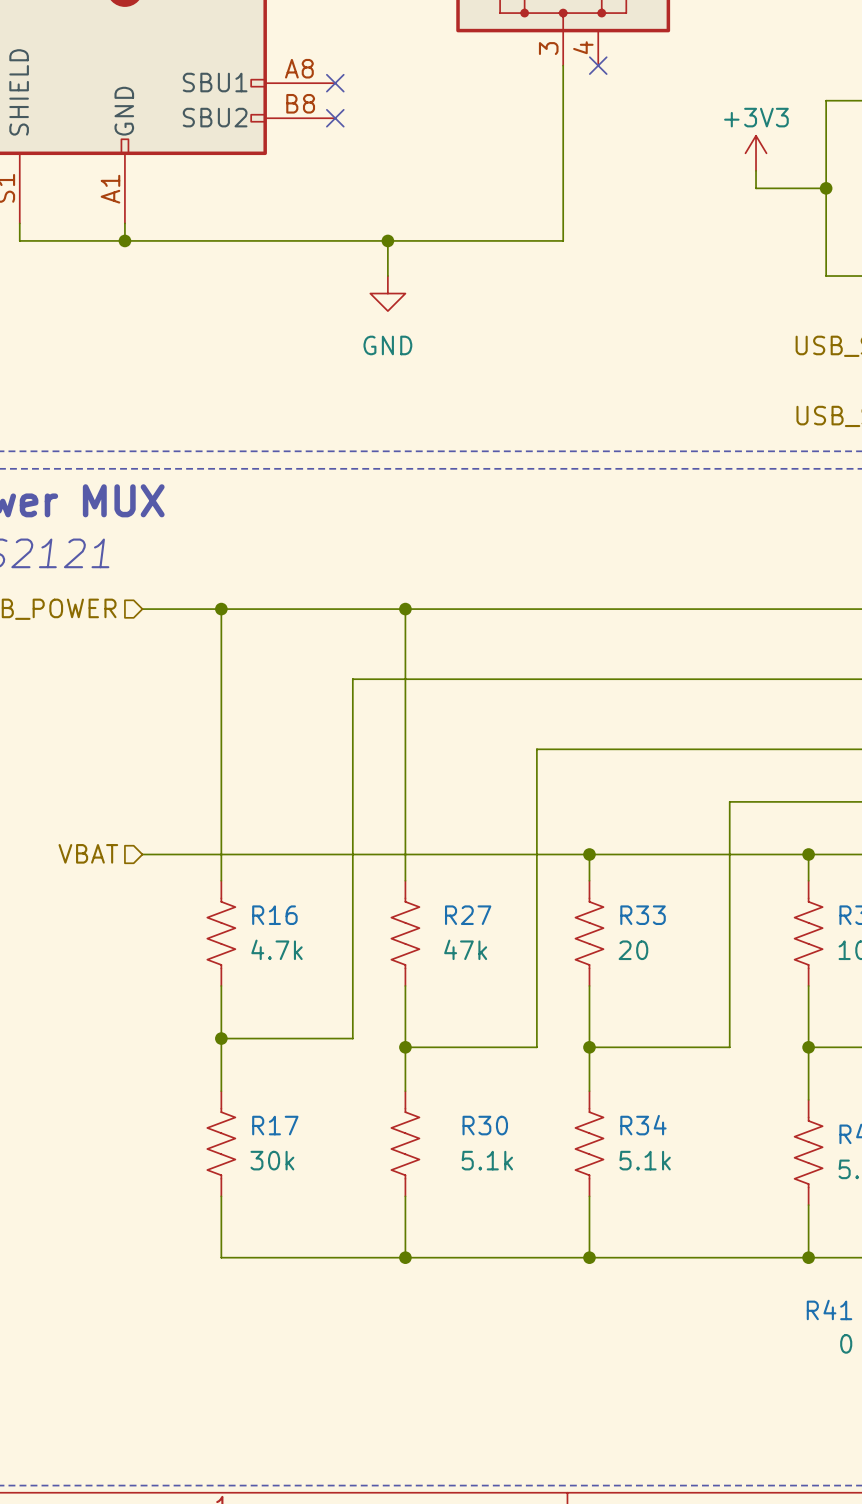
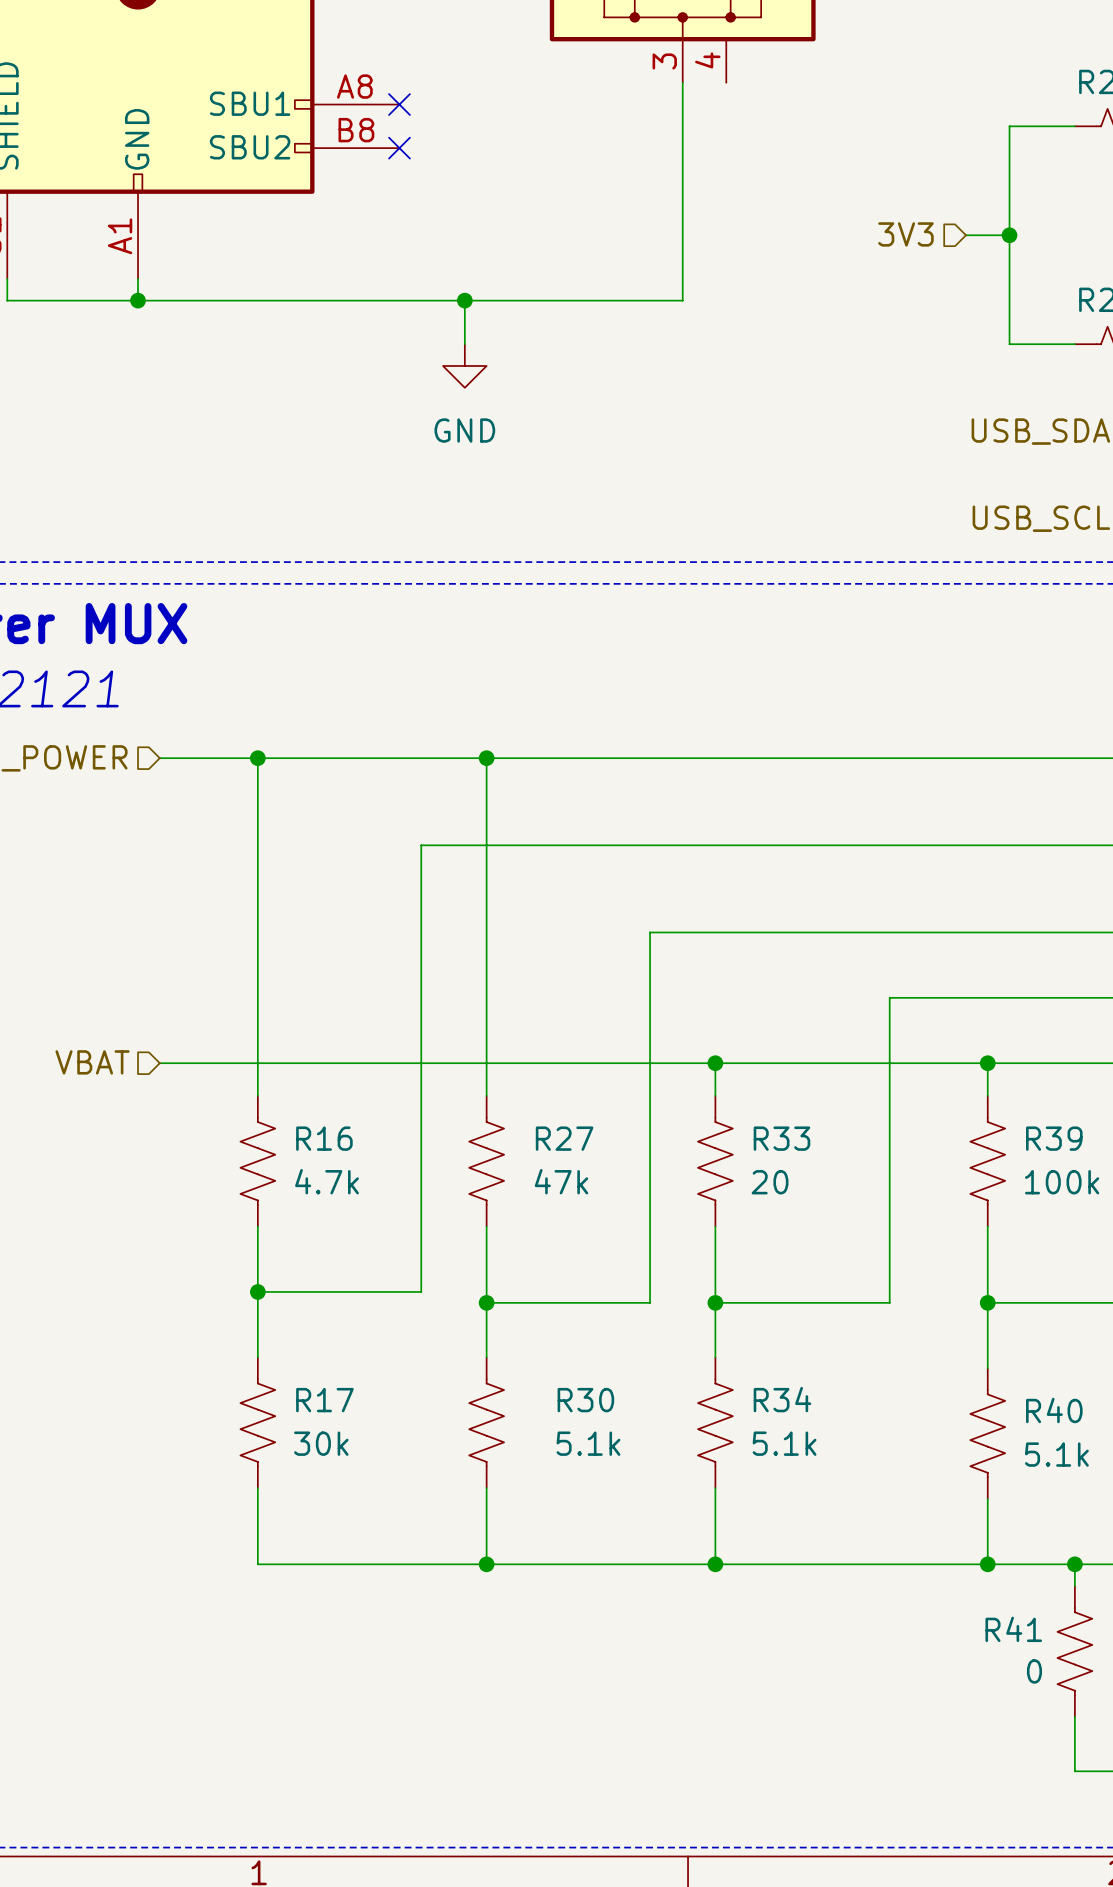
no-connect mark: (598, 65) -> none
power symbol: +3V3 (756, 153) -> none
wire: (756, 170) (756, 188) (791, 188) -> none
hierarchical label: none -> 3V3 (905, 234)

